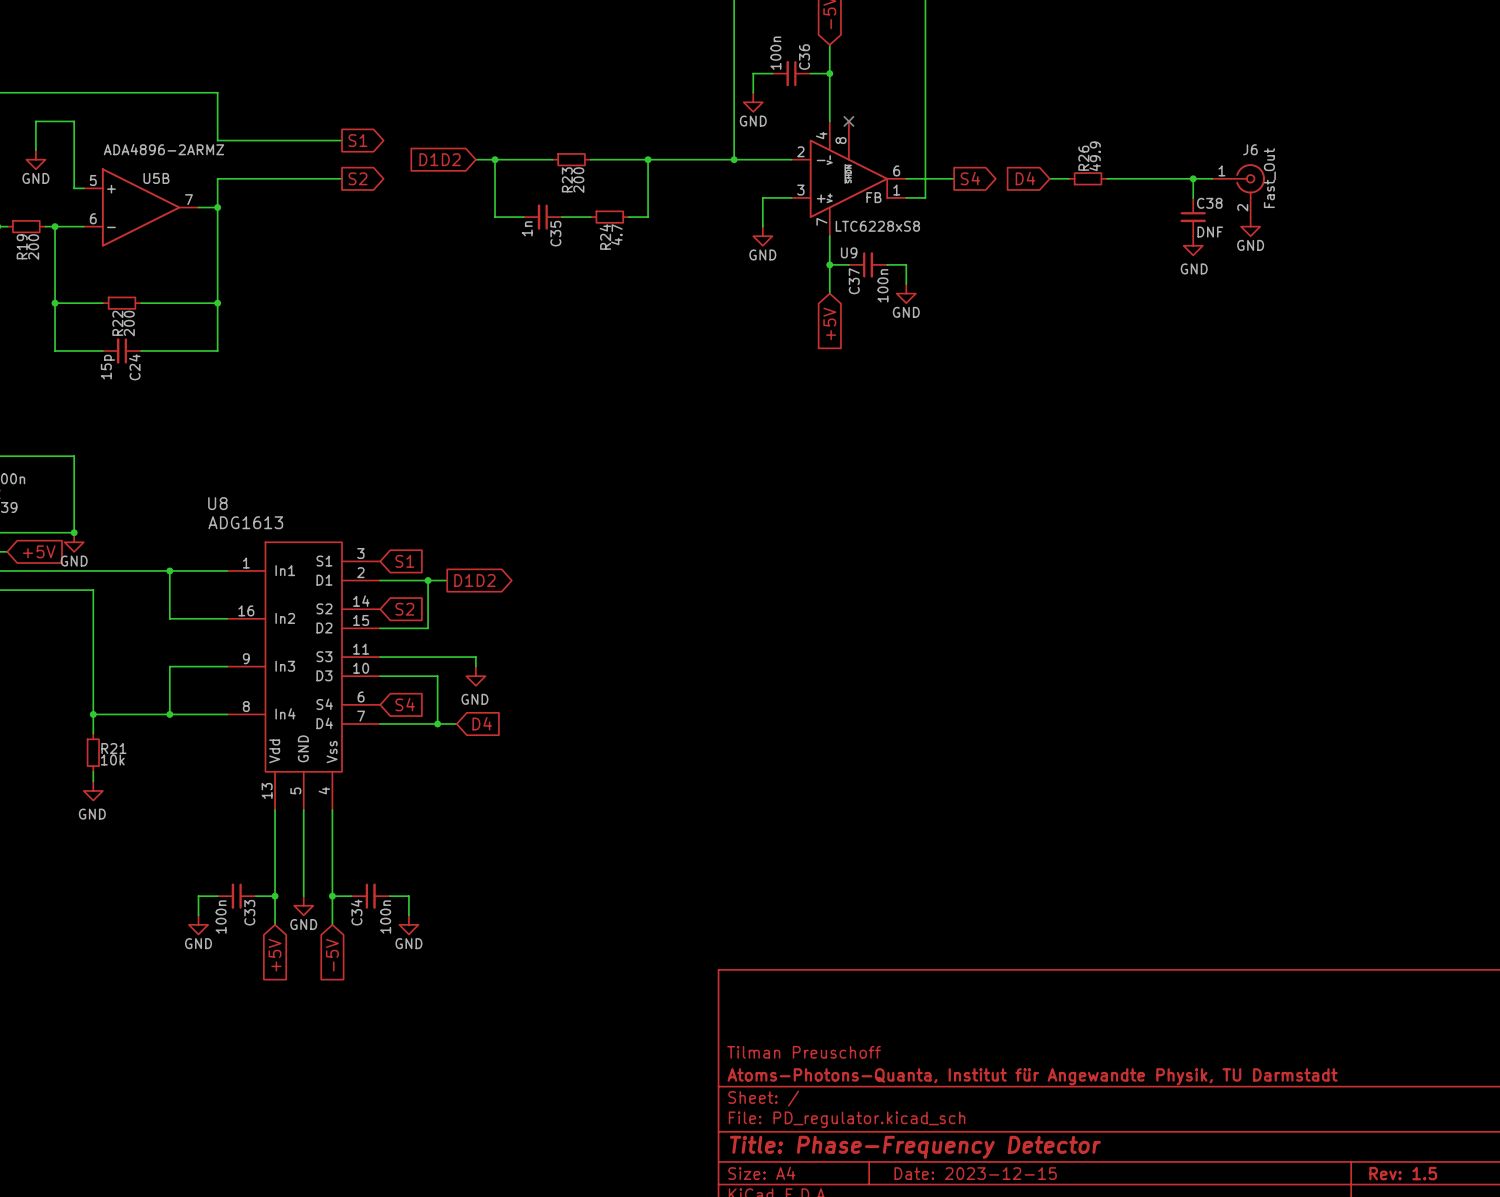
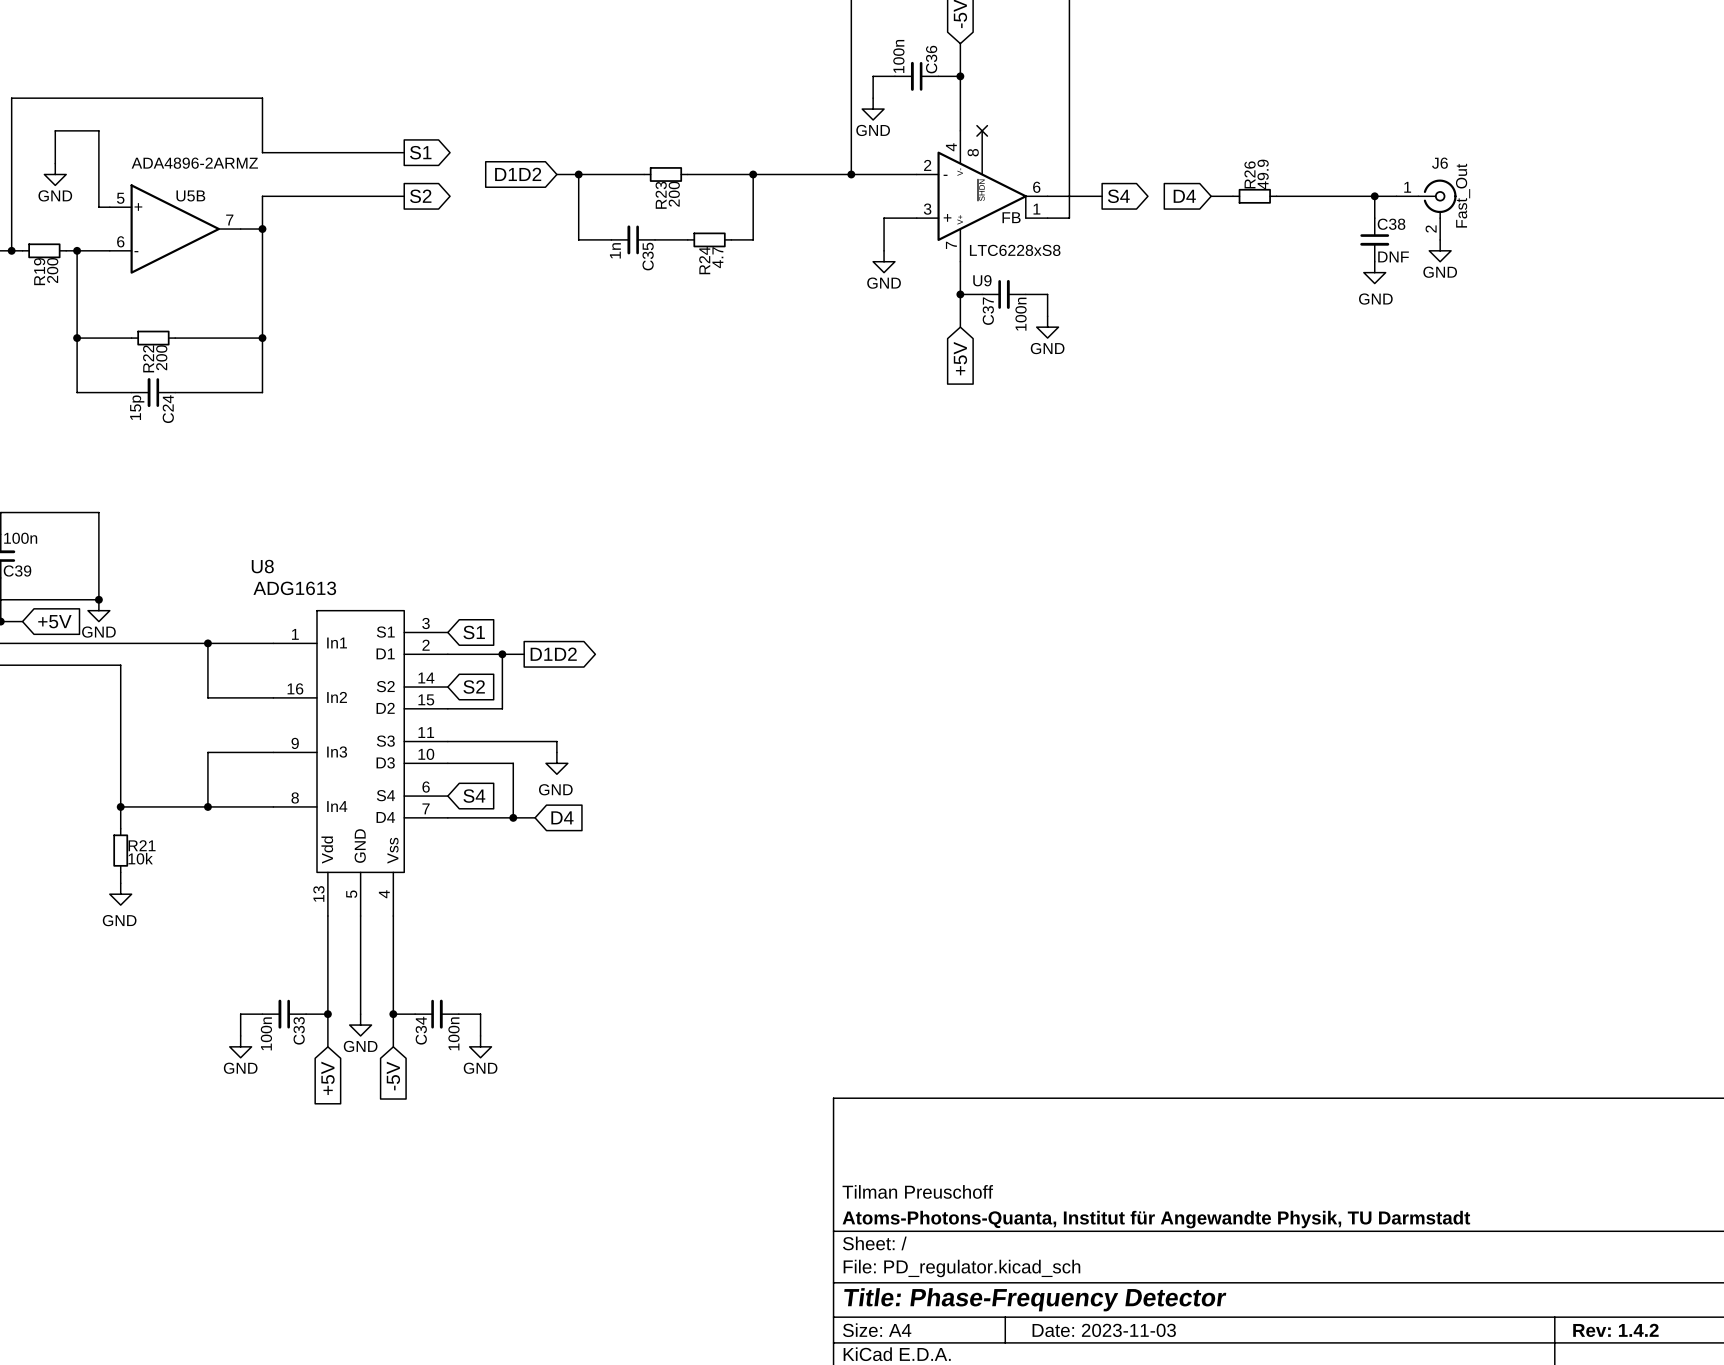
title block: Date: 2023-12-15 (975, 1173) -> Date: 2023-11-03 (1104, 1330)
title block: Rev: 1.5 (1403, 1173) -> Rev: 1.4.2 (1615, 1330)

